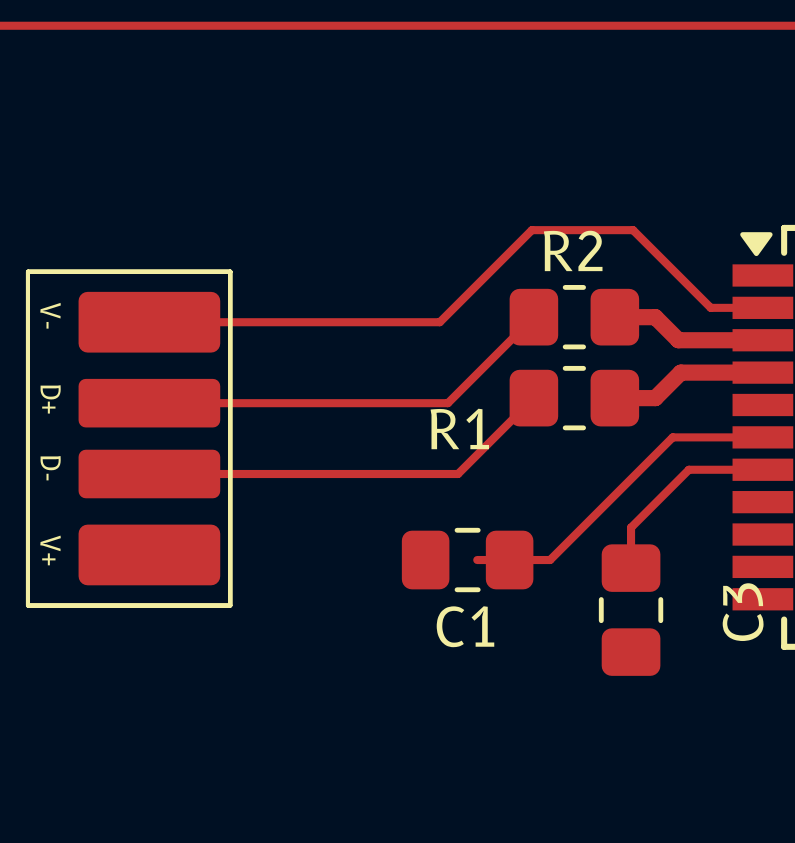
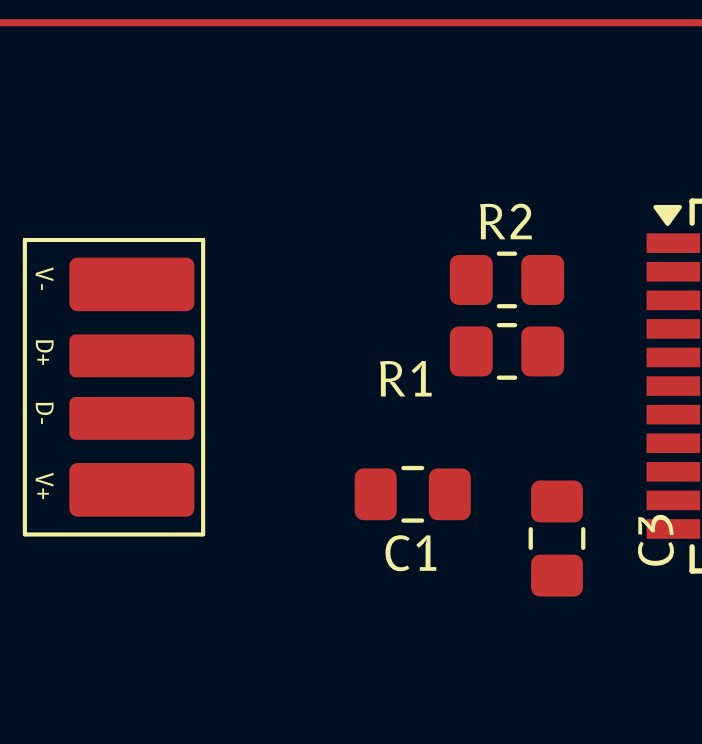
top track: (762, 307) (710, 307) (633, 230) (531, 230) (439, 322) (149, 322) -> none
top track: (527, 311) (533, 317) (447, 403) (149, 403) -> none
top track: (614, 317) (655, 317) (678, 340) (762, 340) -> none
top track: (762, 372) (680, 372) (655, 398) (614, 398) -> none
top track: (517, 381) (533, 398) (458, 474) (149, 474) -> none
top track: (762, 437) (672, 437) (550, 560) (477, 560) -> none
top track: (762, 469) (688, 469) (631, 527) (631, 568) -> none

